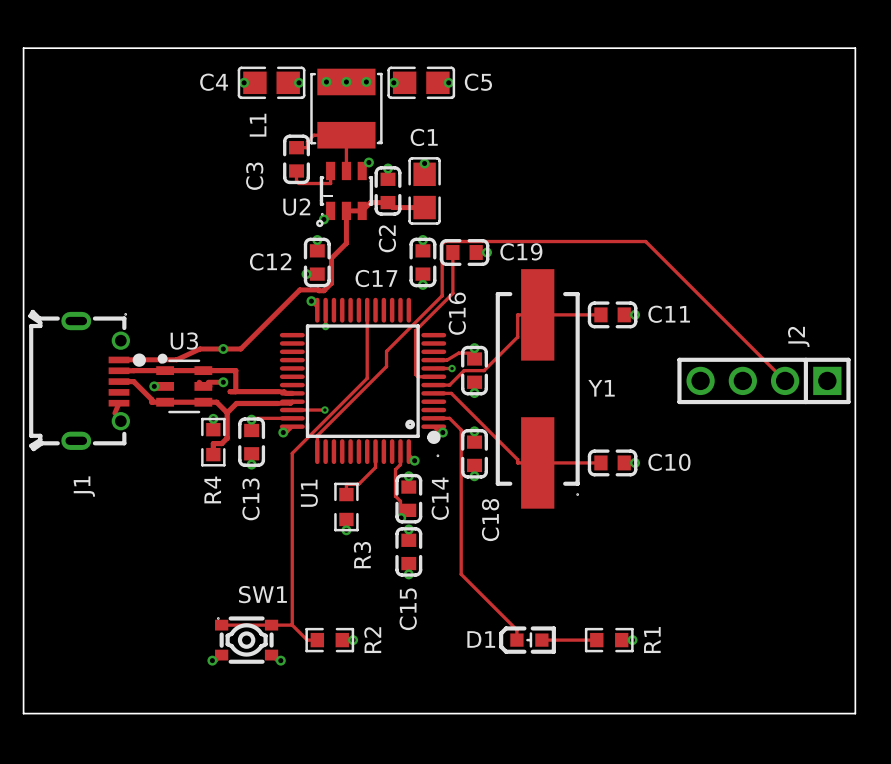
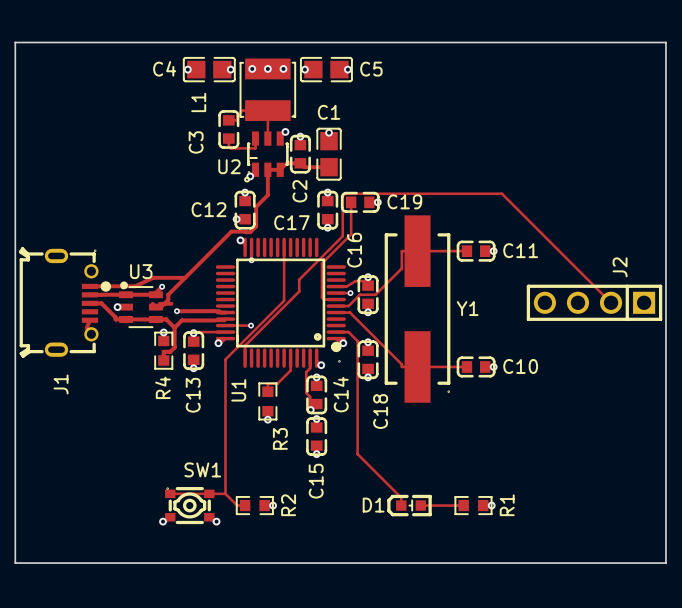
via: (223, 348) -> none
track: none -> (185, 277) (168, 294) (168, 299) (161, 307)
via: none -> (162, 286)
track: (203, 370) (235, 370) (235, 391) -> (155, 294) (162, 286)
via: (223, 382) -> none
via: none -> (176, 311)

